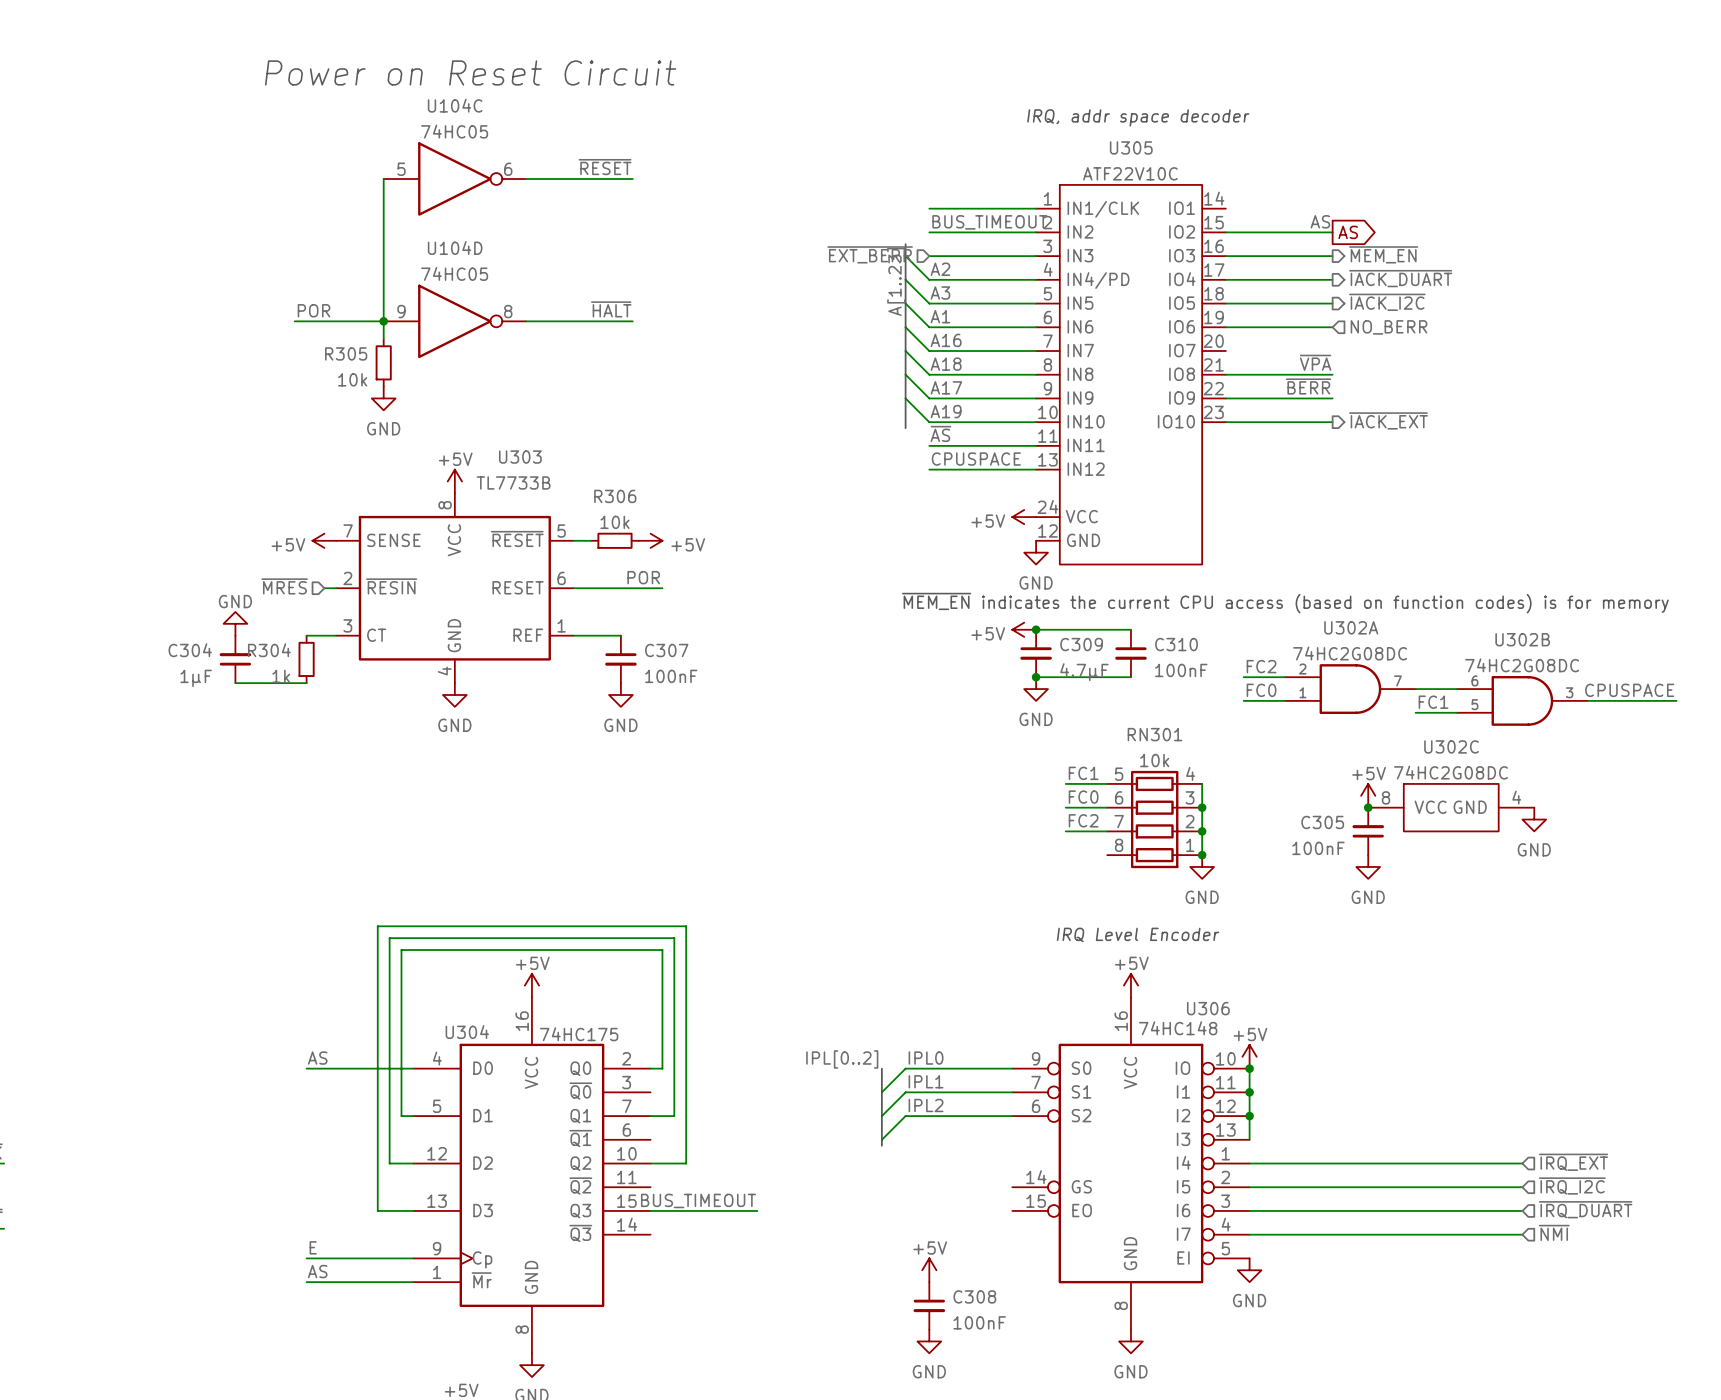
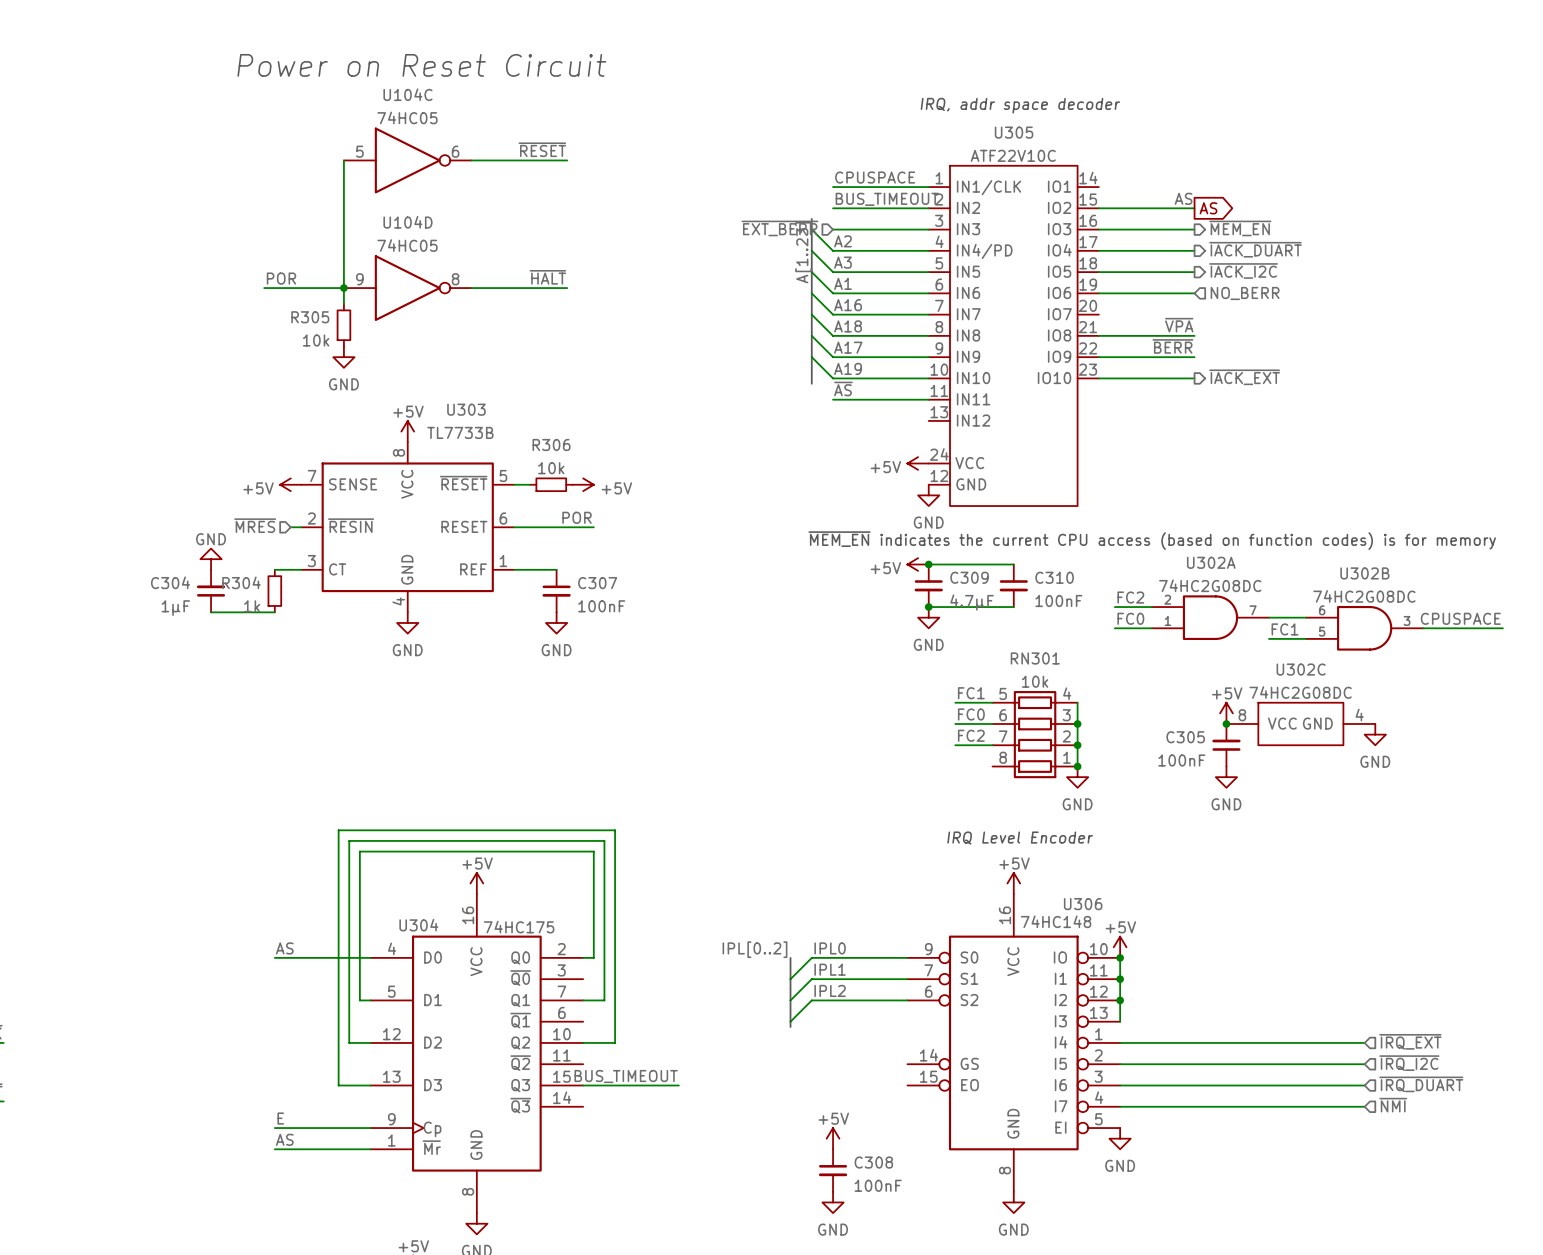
label: none -> CPUSPACE (875, 177)
label: CPUSPACE (976, 459) -> none
wire: (929, 469) (1036, 469) -> none

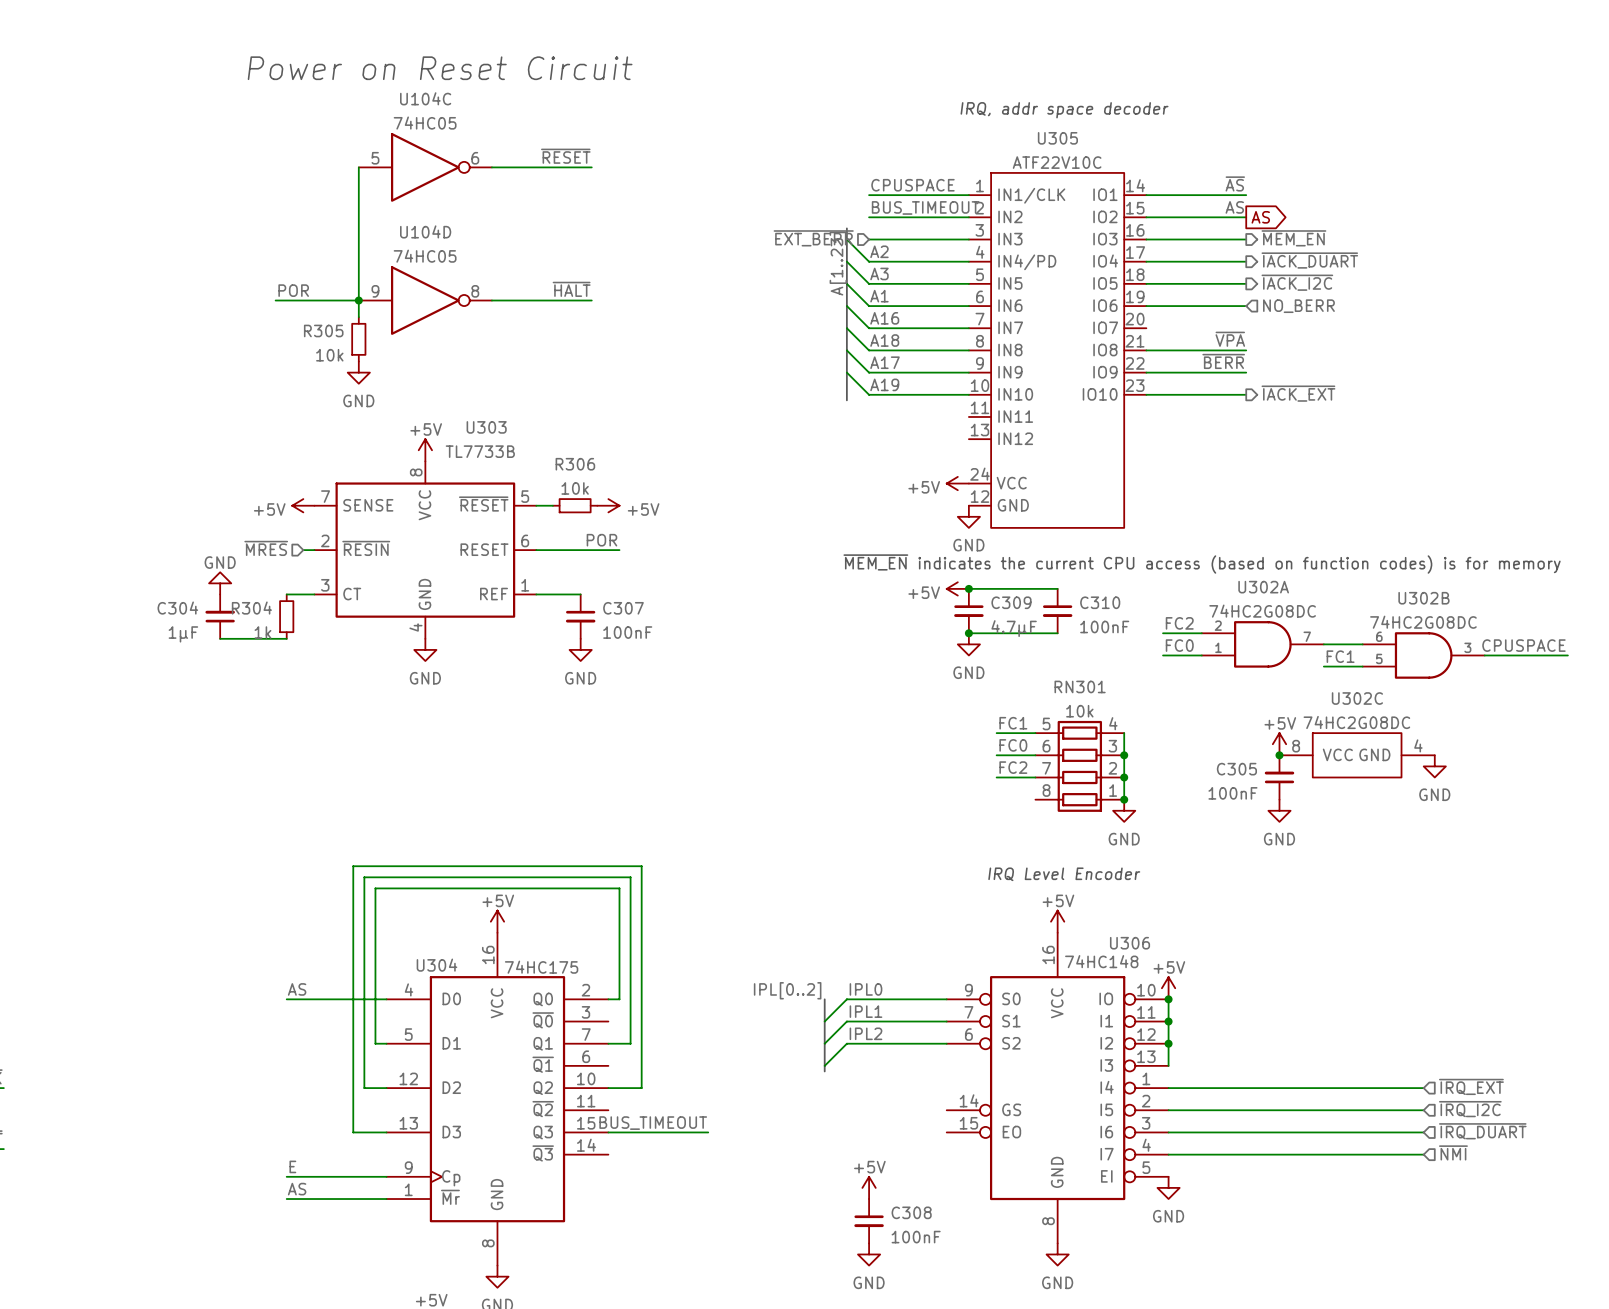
label: none -> ~{AS} (1235, 183)
wire: none -> (1146, 195) (1246, 195)
label: ~{AS} (843, 388) -> none
wire: (833, 399) (928, 399) -> none

